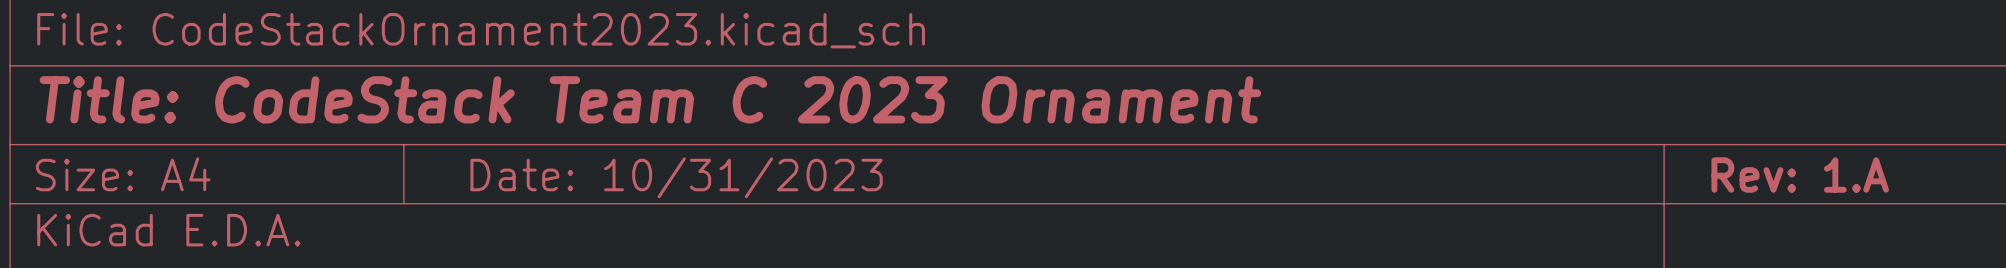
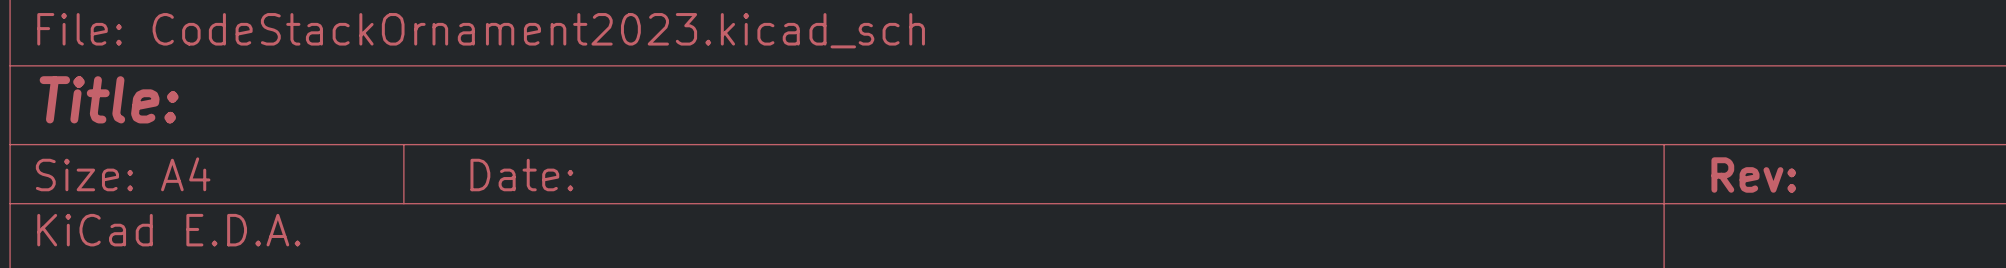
title block: Title: CodeStack Team C 2023 Ornament (650, 99) -> Title: (109, 99)
title block: Rev: 1.A (1800, 175) -> Rev: (1753, 175)
title block: Date: 10/31/2023 (676, 177) -> Date: (521, 175)

